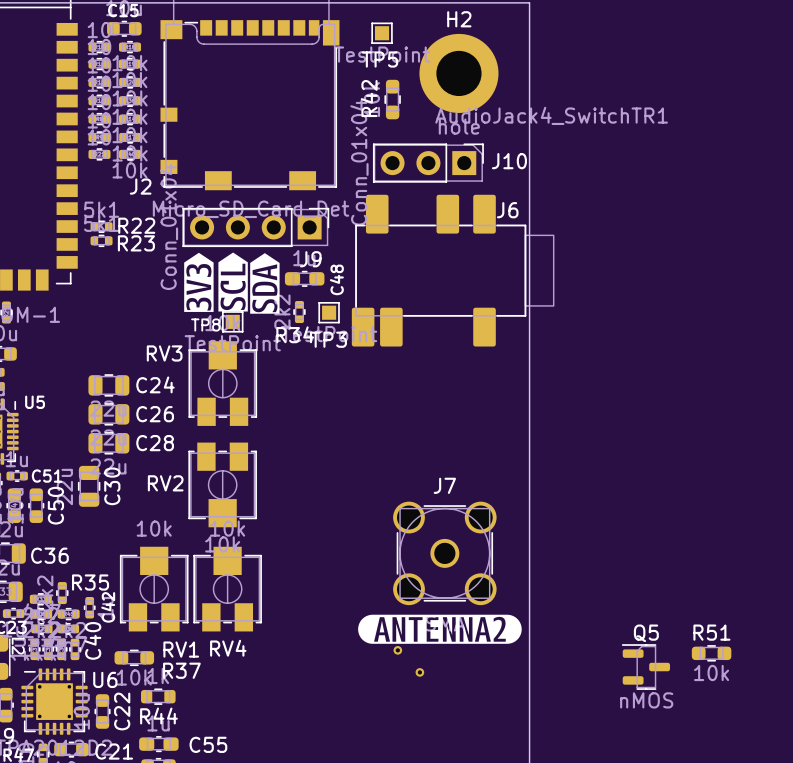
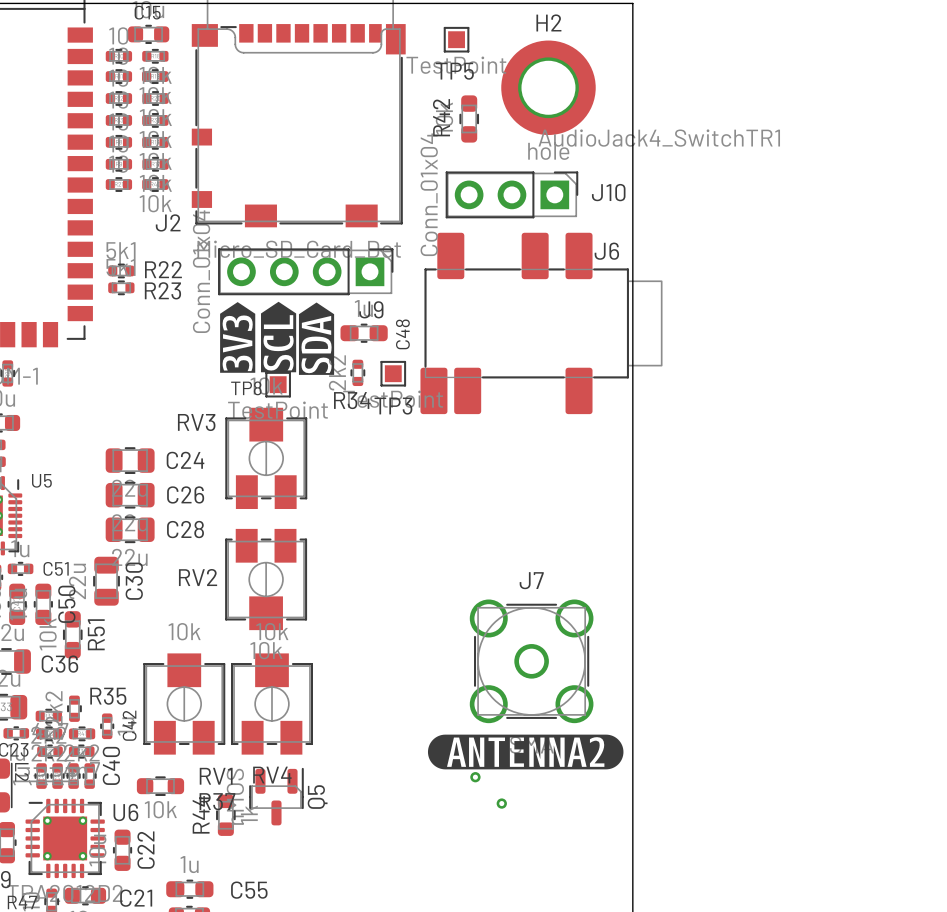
R51 rotation: 0° (711, 653) -> 90° clockwise (72, 634)
R51 position: (711, 653) -> (72, 634)
Q5 rotation: 0° (645, 667) -> 90° clockwise (276, 796)
Q5 position: (645, 667) -> (276, 796)
R44 rotation: 0° (158, 696) -> 90° clockwise (225, 815)
R44 position: (158, 696) -> (225, 815)

